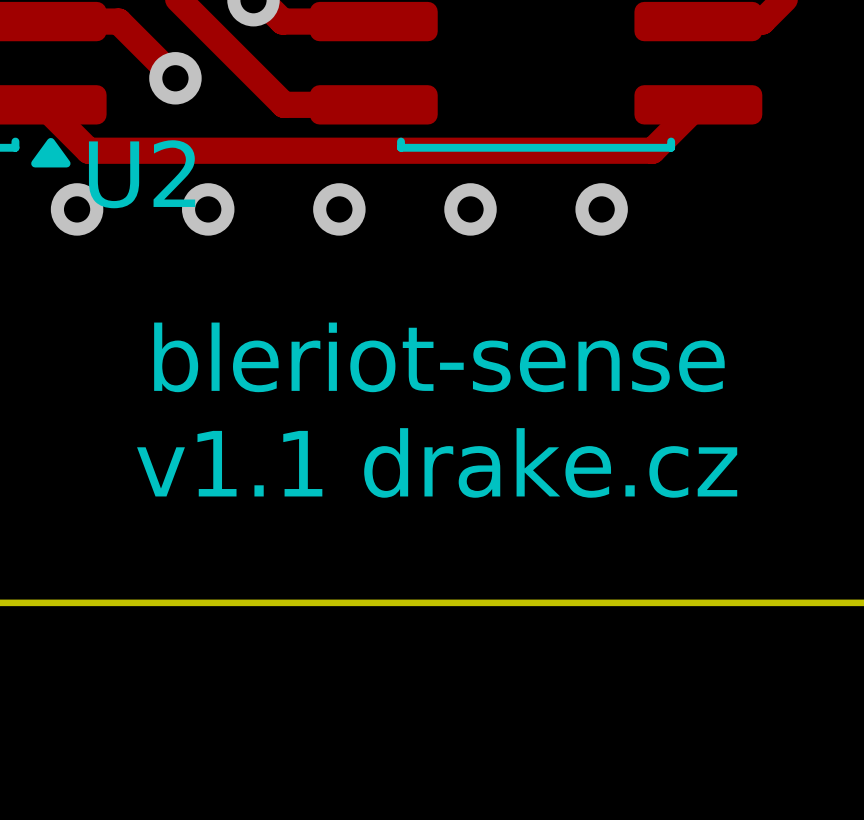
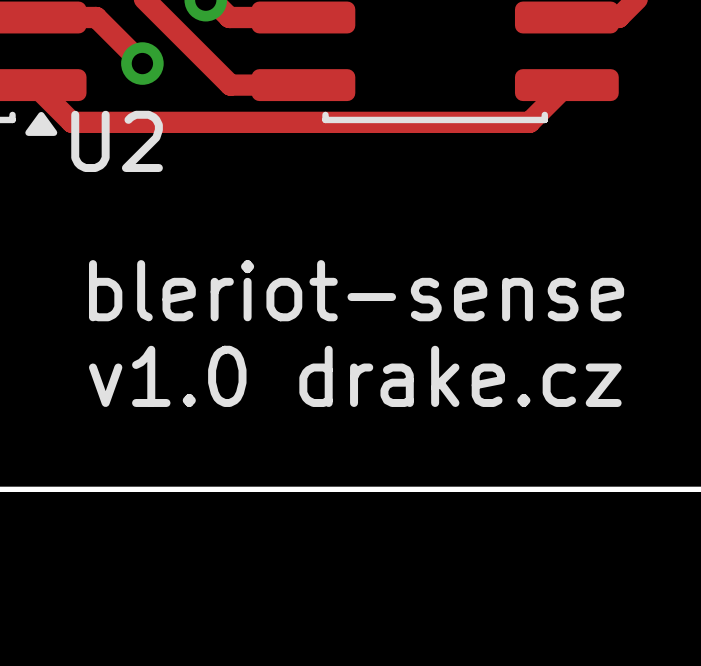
via: (77, 209) -> none
via: (208, 209) -> none
via: (339, 209) -> none
via: (470, 209) -> none
via: (601, 209) -> none
text: v1.1 drake.cz (437, 462) -> v1.0 drake.cz (355, 376)

